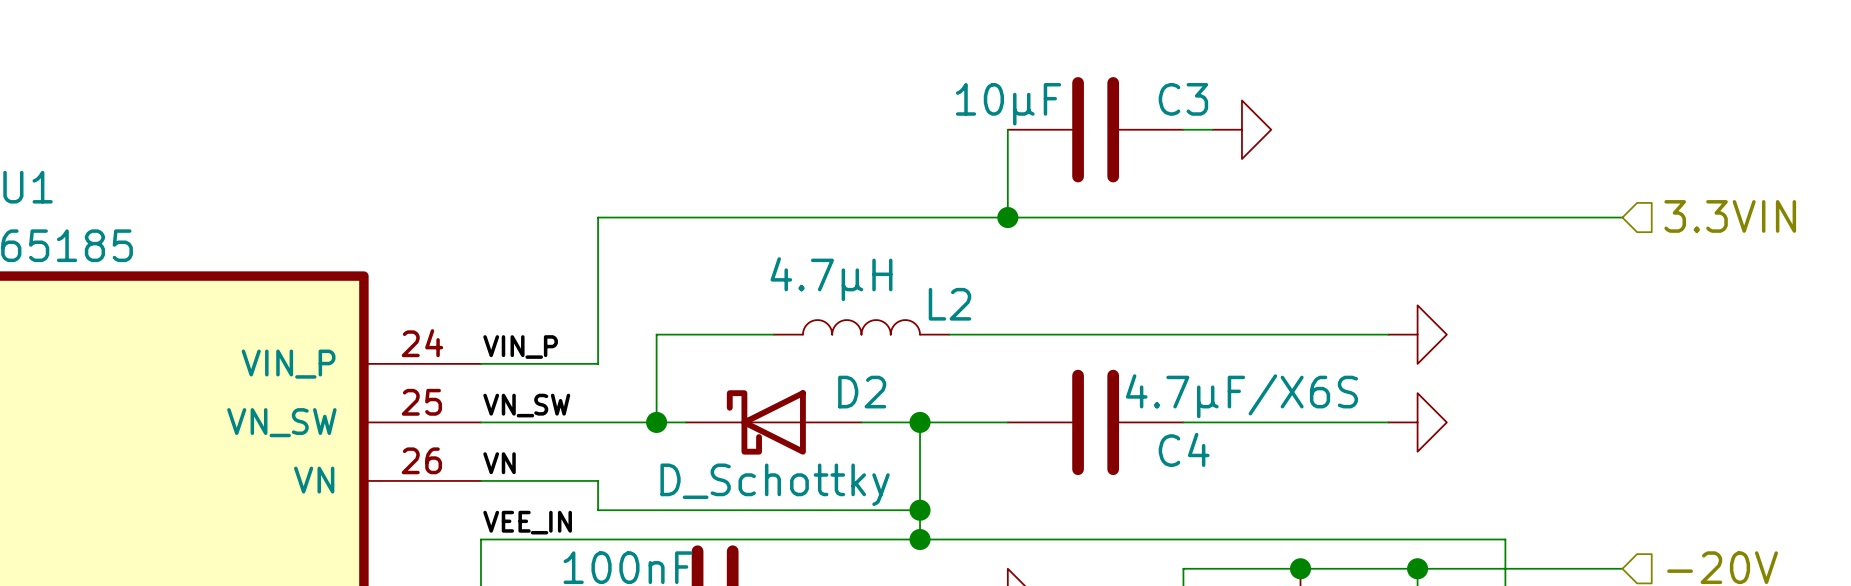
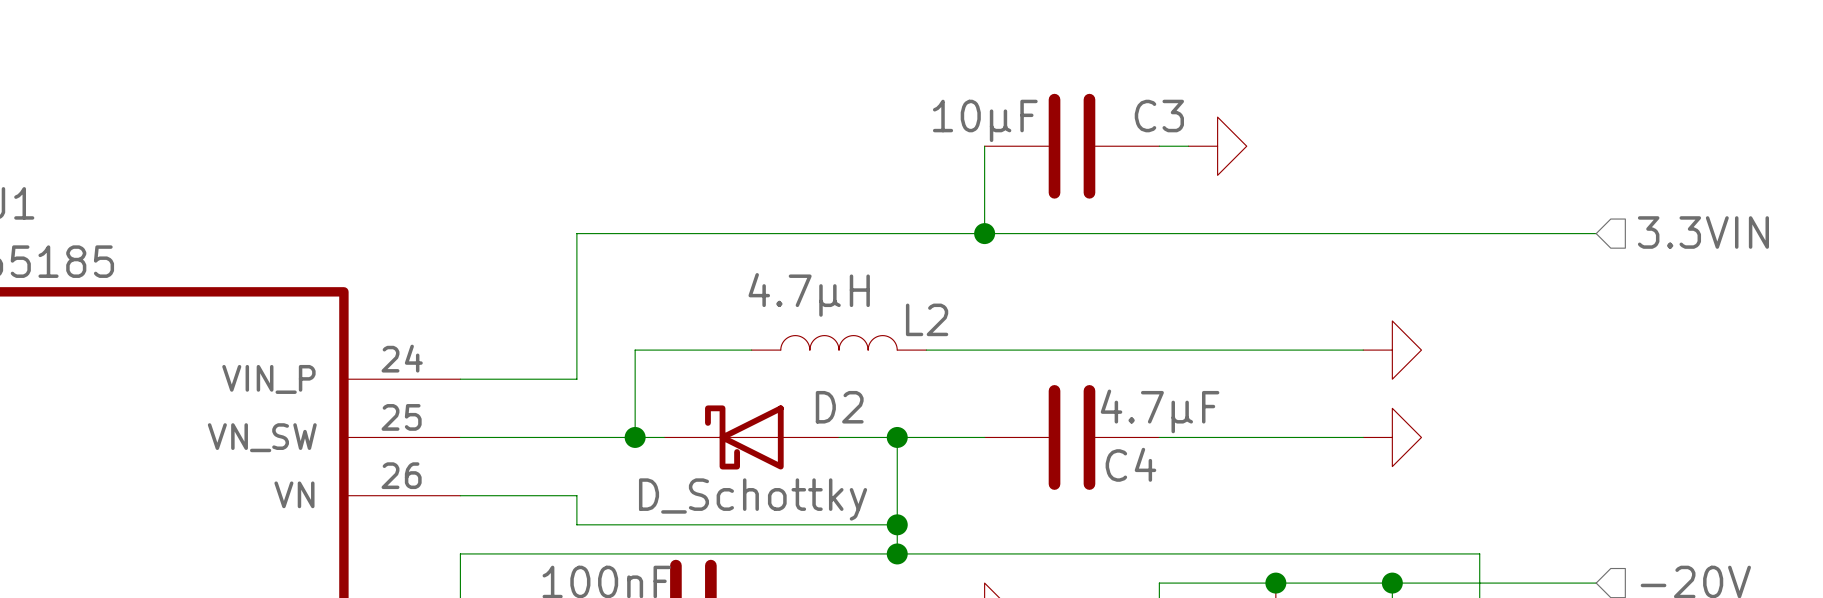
label: VIN_P (520, 347) -> none
C4 value: 4.7µF/X6S (1241, 396) -> 4.7µF (1160, 411)
label: VN_SW (526, 405) -> none
C4 name position: C4 (1184, 449) -> C4 (1130, 464)
label: VN (499, 463) -> none
label: VEE_IN (527, 522) -> none

